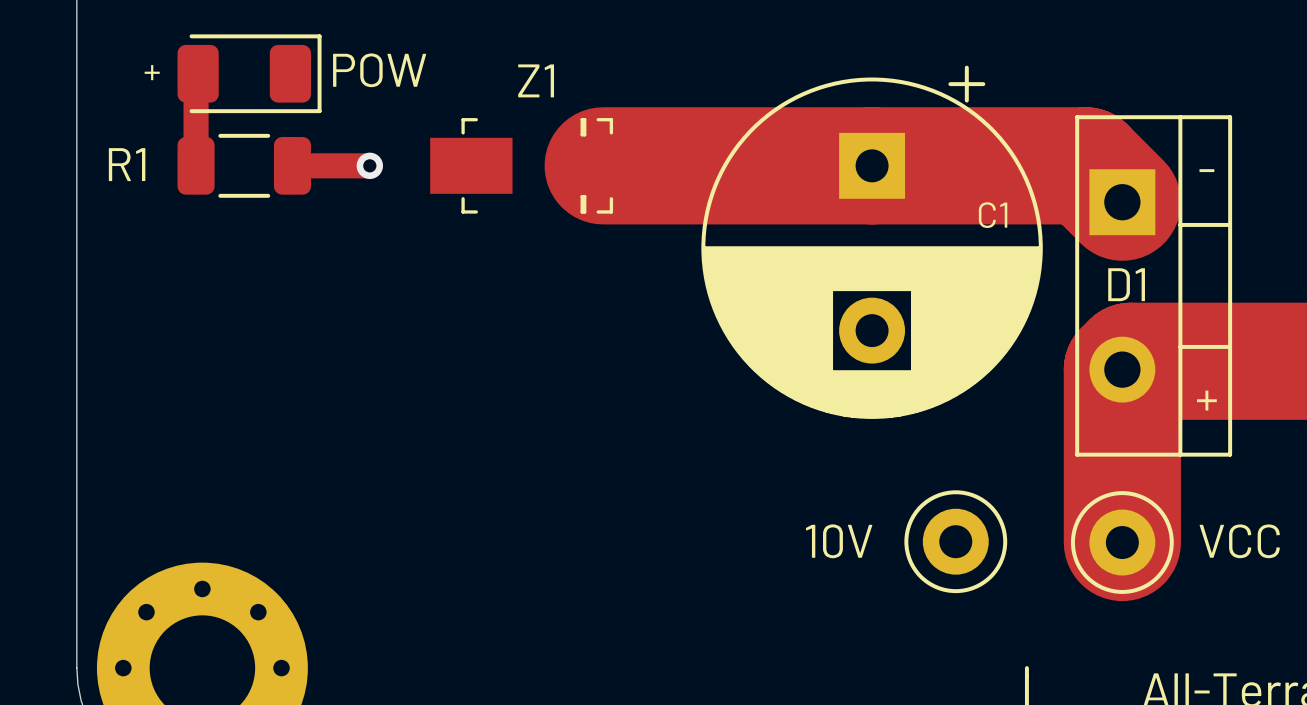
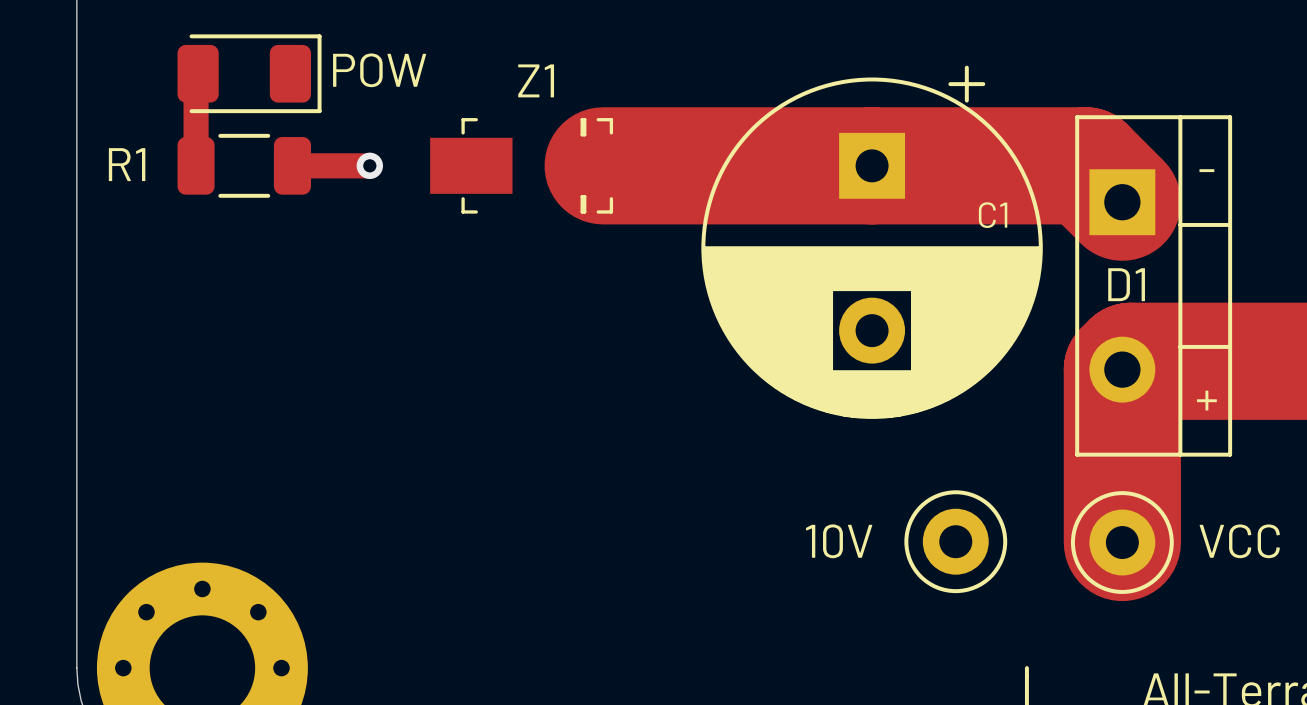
text: + (152, 72) -> none

